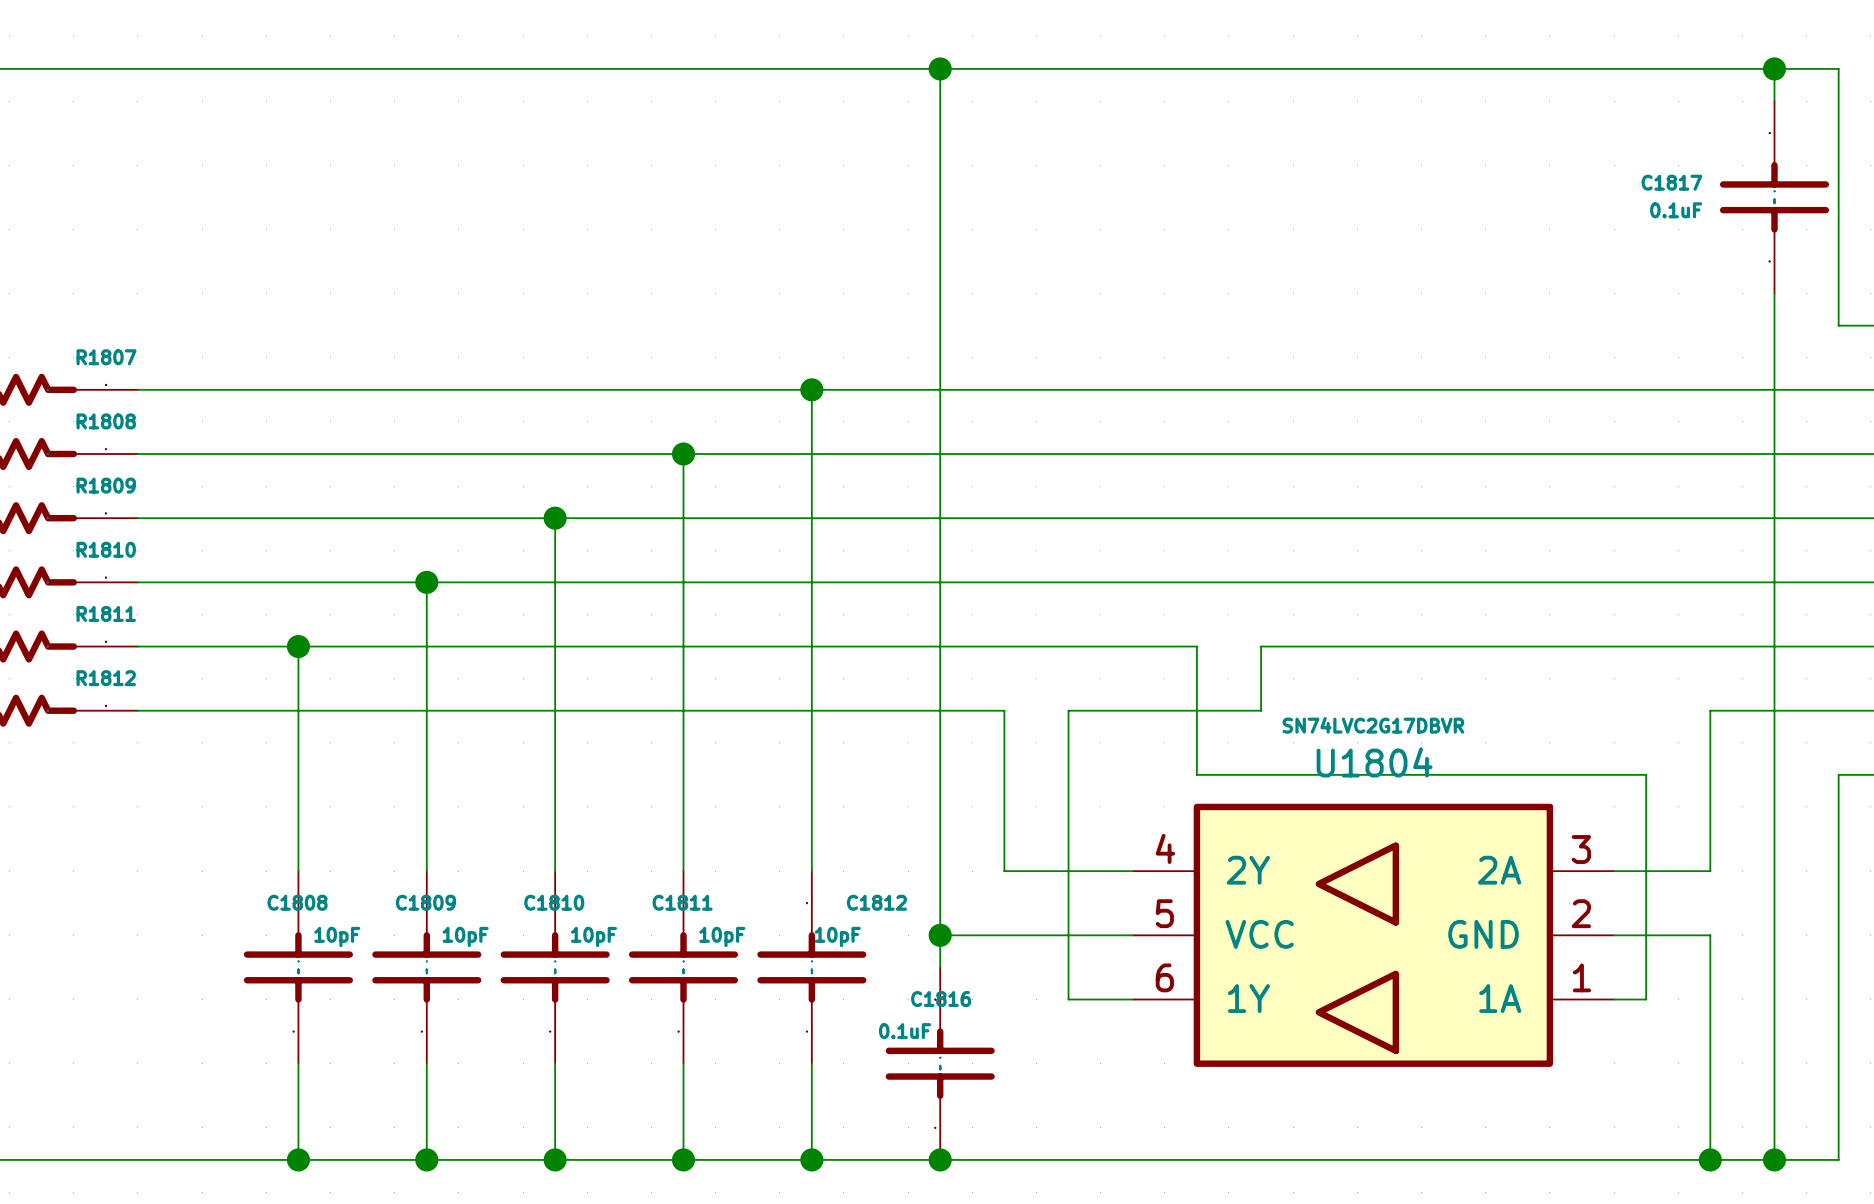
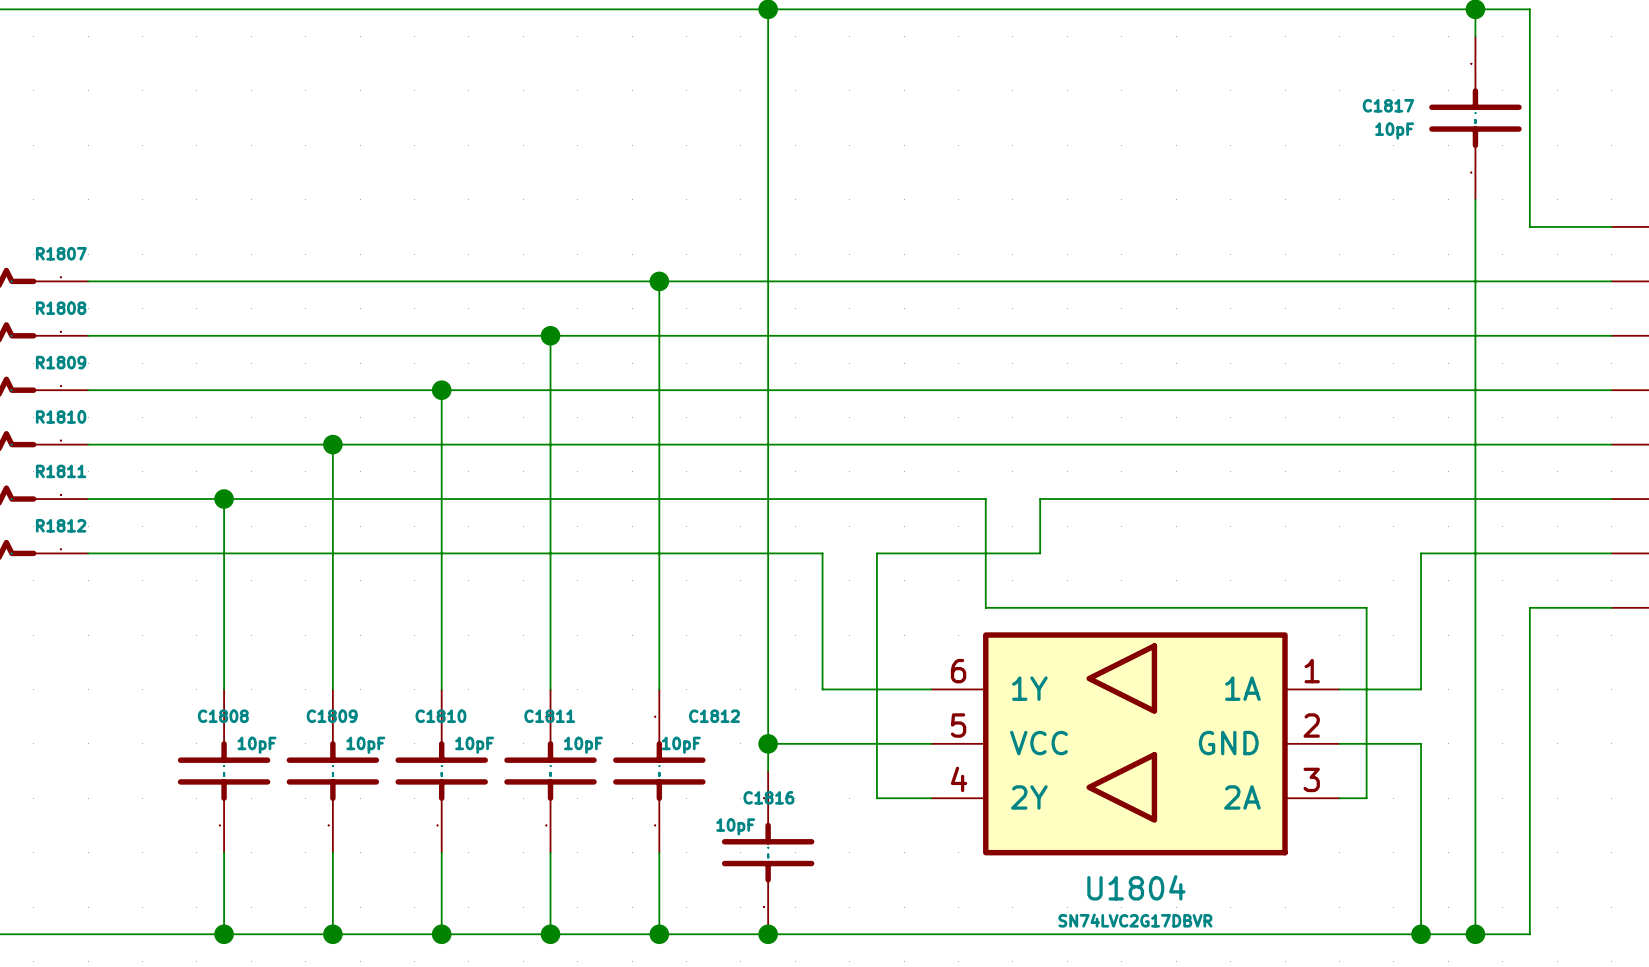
C1817 value: 0.1uF (1676, 210) -> 10pF (1394, 131)
U1804 flip: as is (1373, 935) -> up-down (1135, 743)
C1816 value: 0.1uF (905, 1031) -> 10pF (735, 826)

